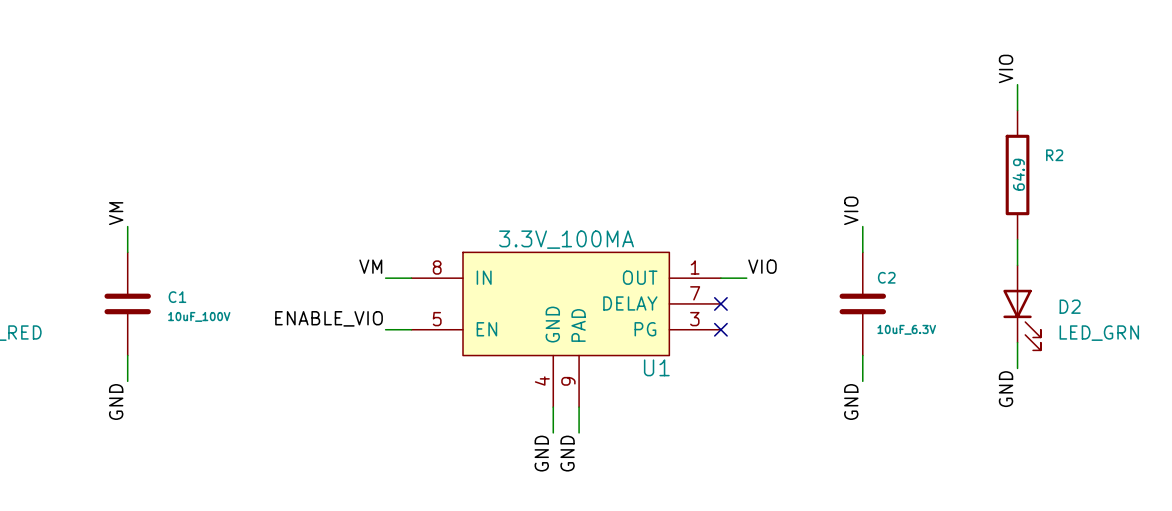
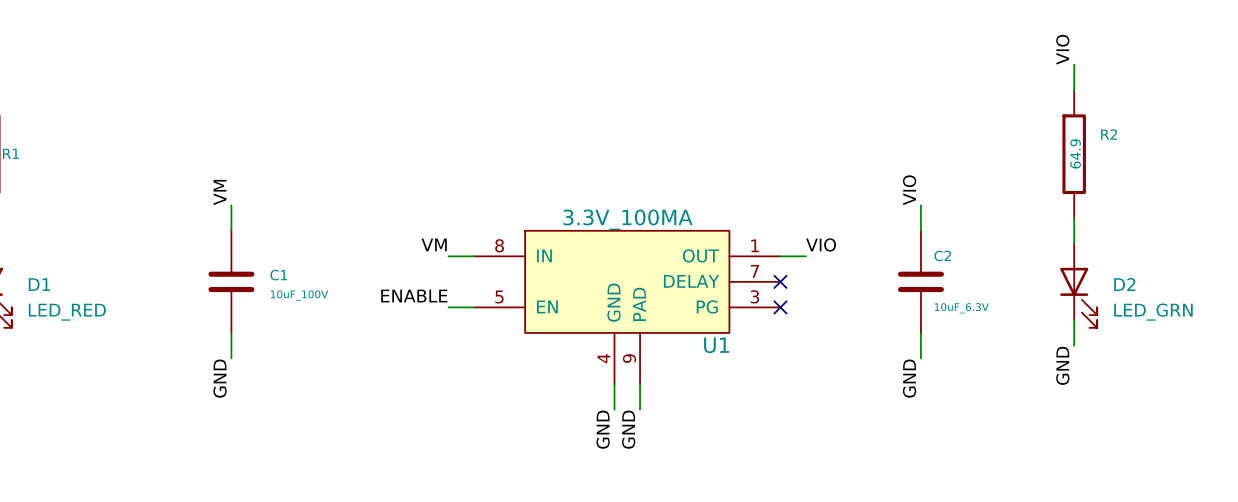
label position: VM (116, 213) -> VM (220, 192)
wire: (127, 226) (127, 252) -> (231, 205) (231, 230)
C1 position: (127, 303) -> (231, 281)
label: ENABLE_VIO (329, 318) -> ENABLE (414, 296)
wire: (127, 355) (127, 381) -> (231, 332) (231, 358)
label position: GND (116, 402) -> GND (220, 378)

